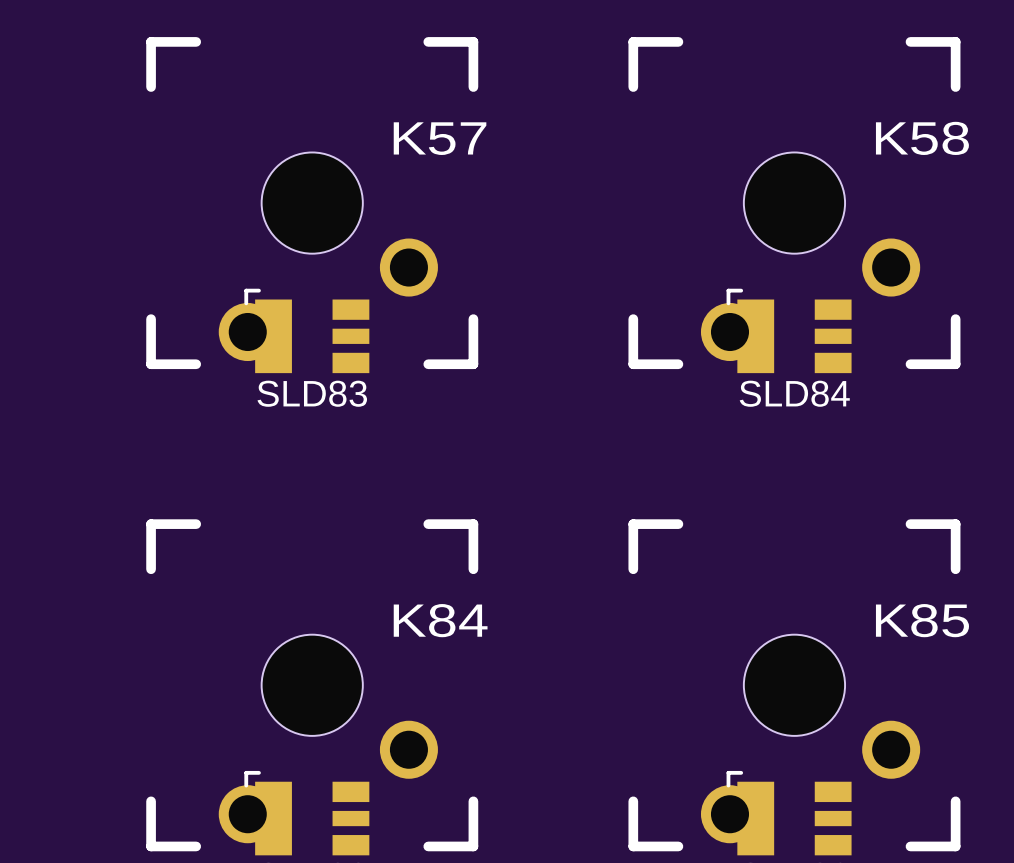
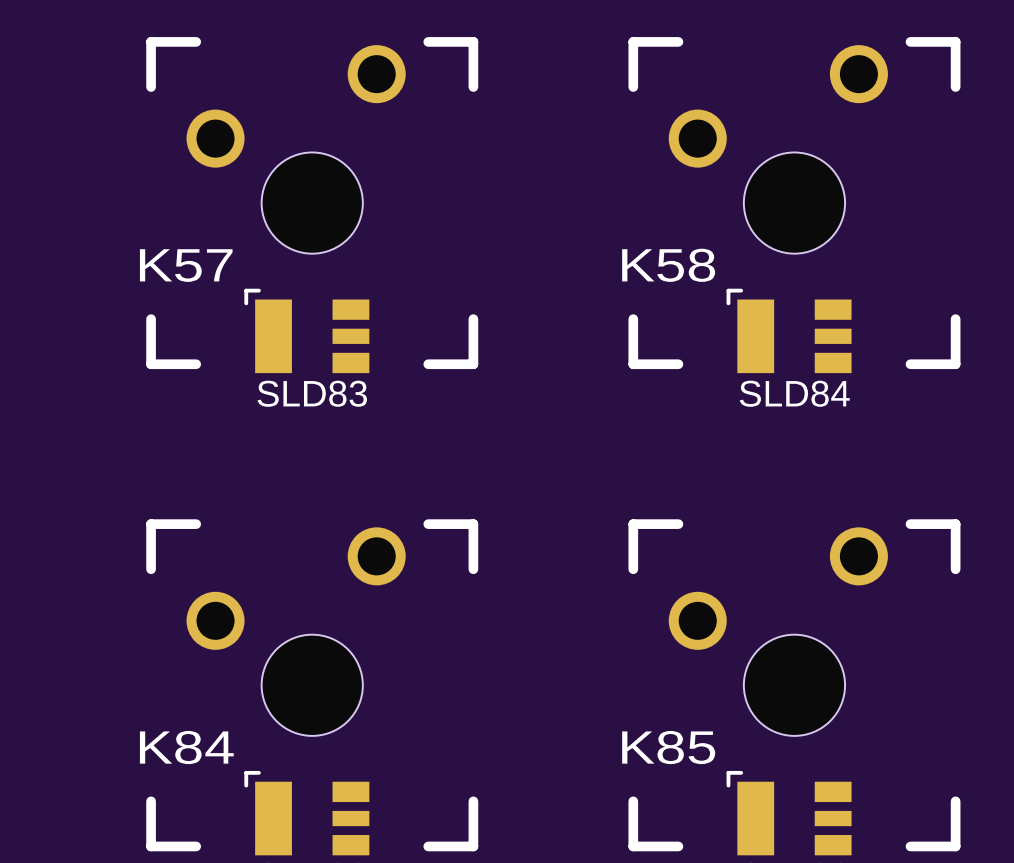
K57 rotation: 0° (312, 203) -> 180° (312, 203)
K58 rotation: 0° (794, 203) -> 180° (794, 203)
K84 rotation: 0° (312, 685) -> 180° (312, 685)
K85 rotation: 0° (794, 685) -> 180° (794, 685)

